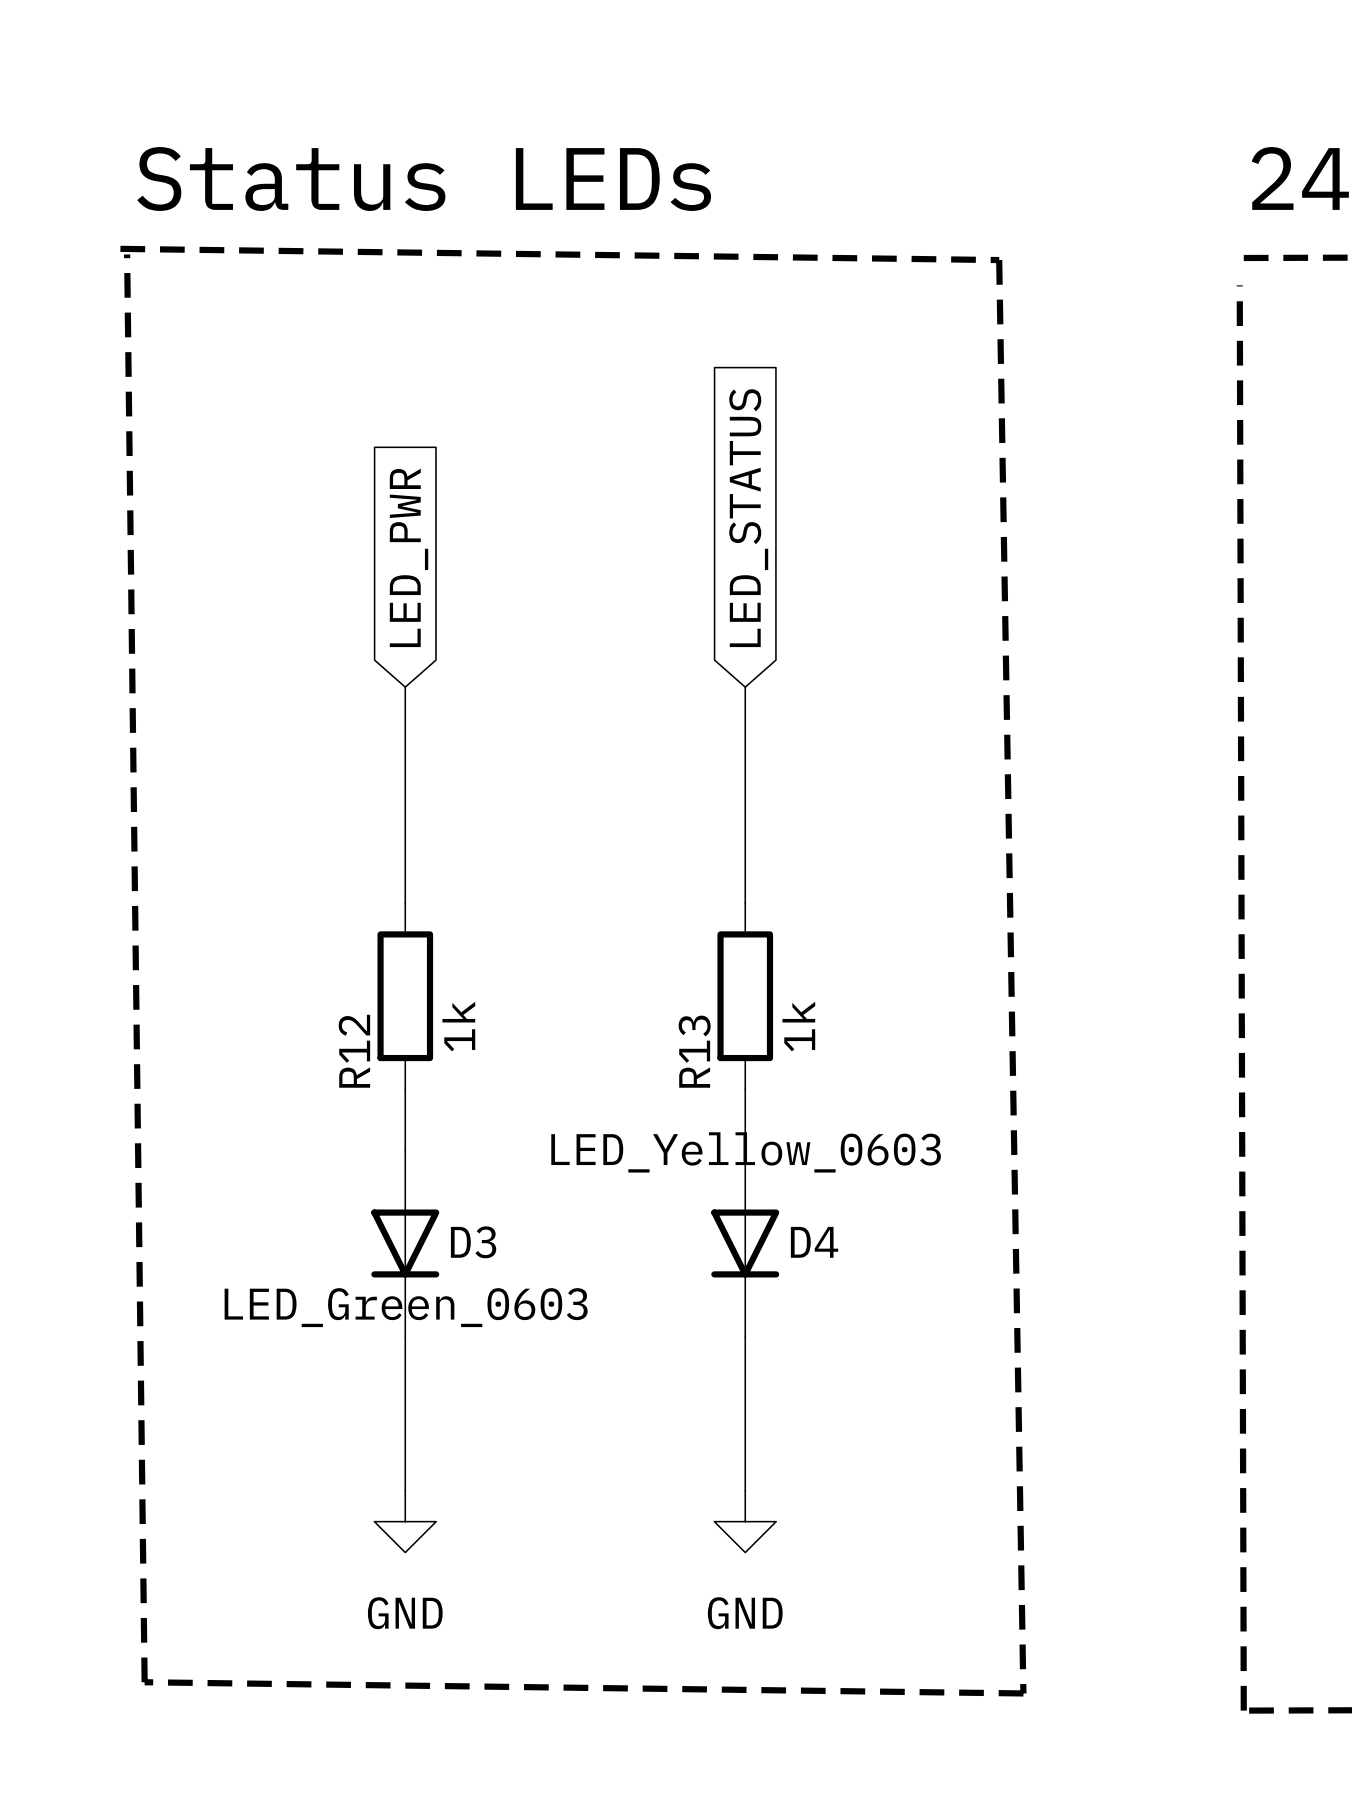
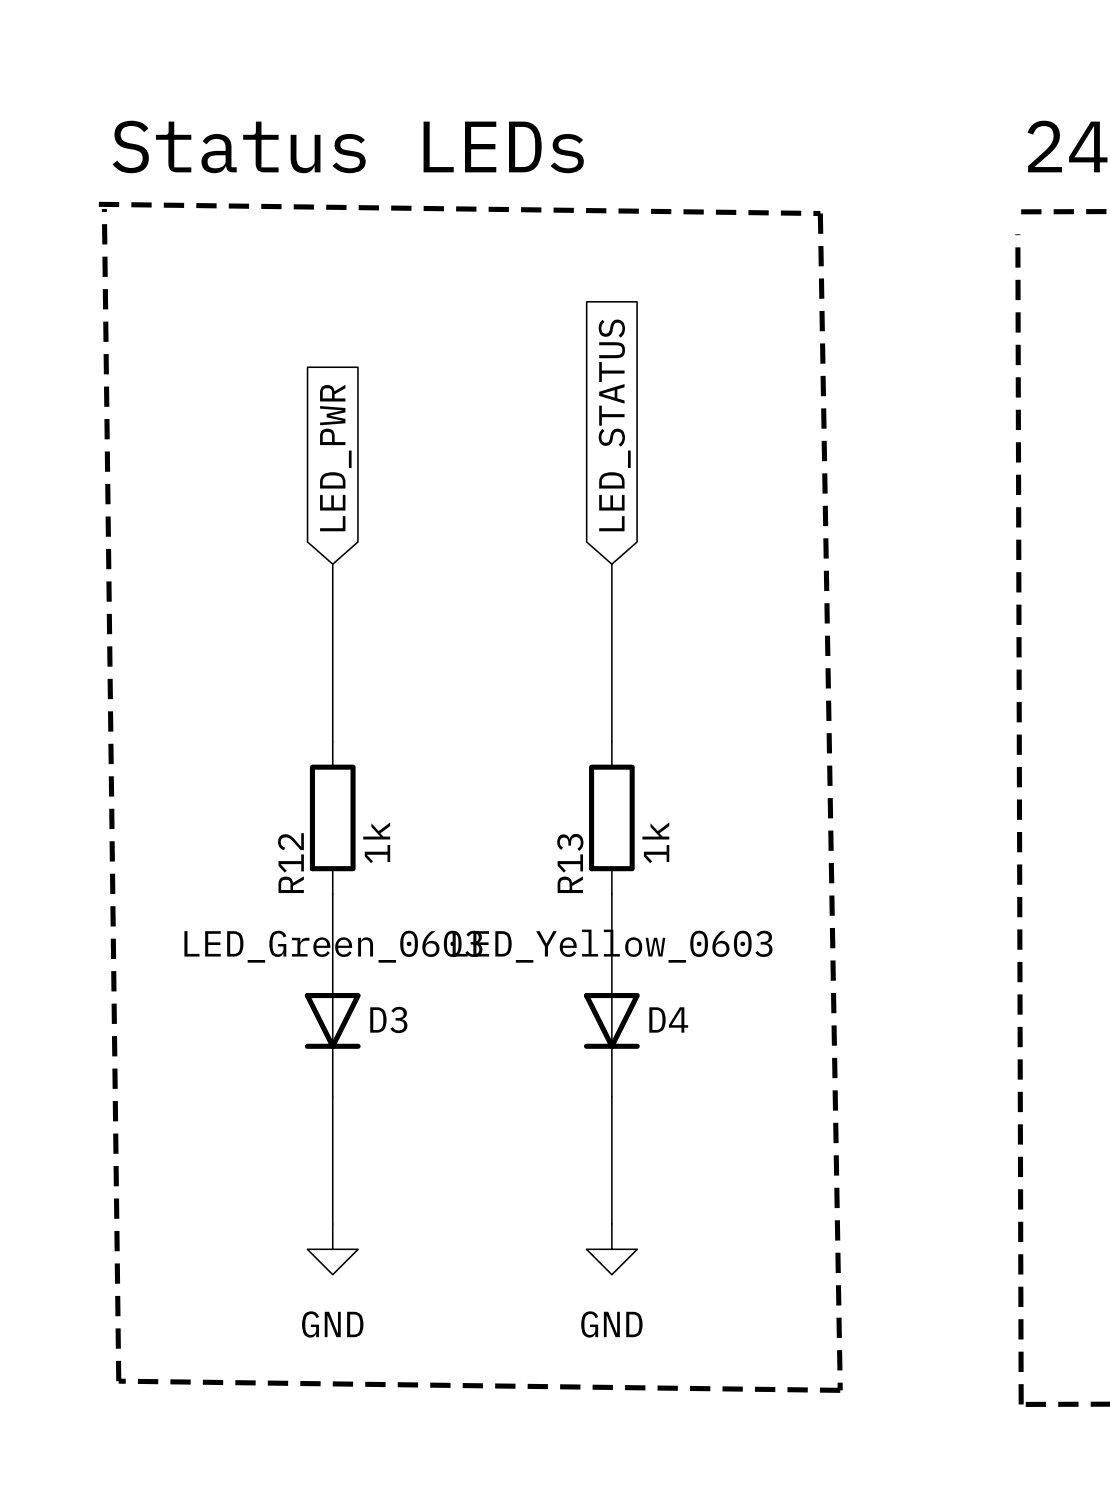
D3 value position: LED_Green_0603 (406, 1307) -> LED_Green_0603 (333, 946)

